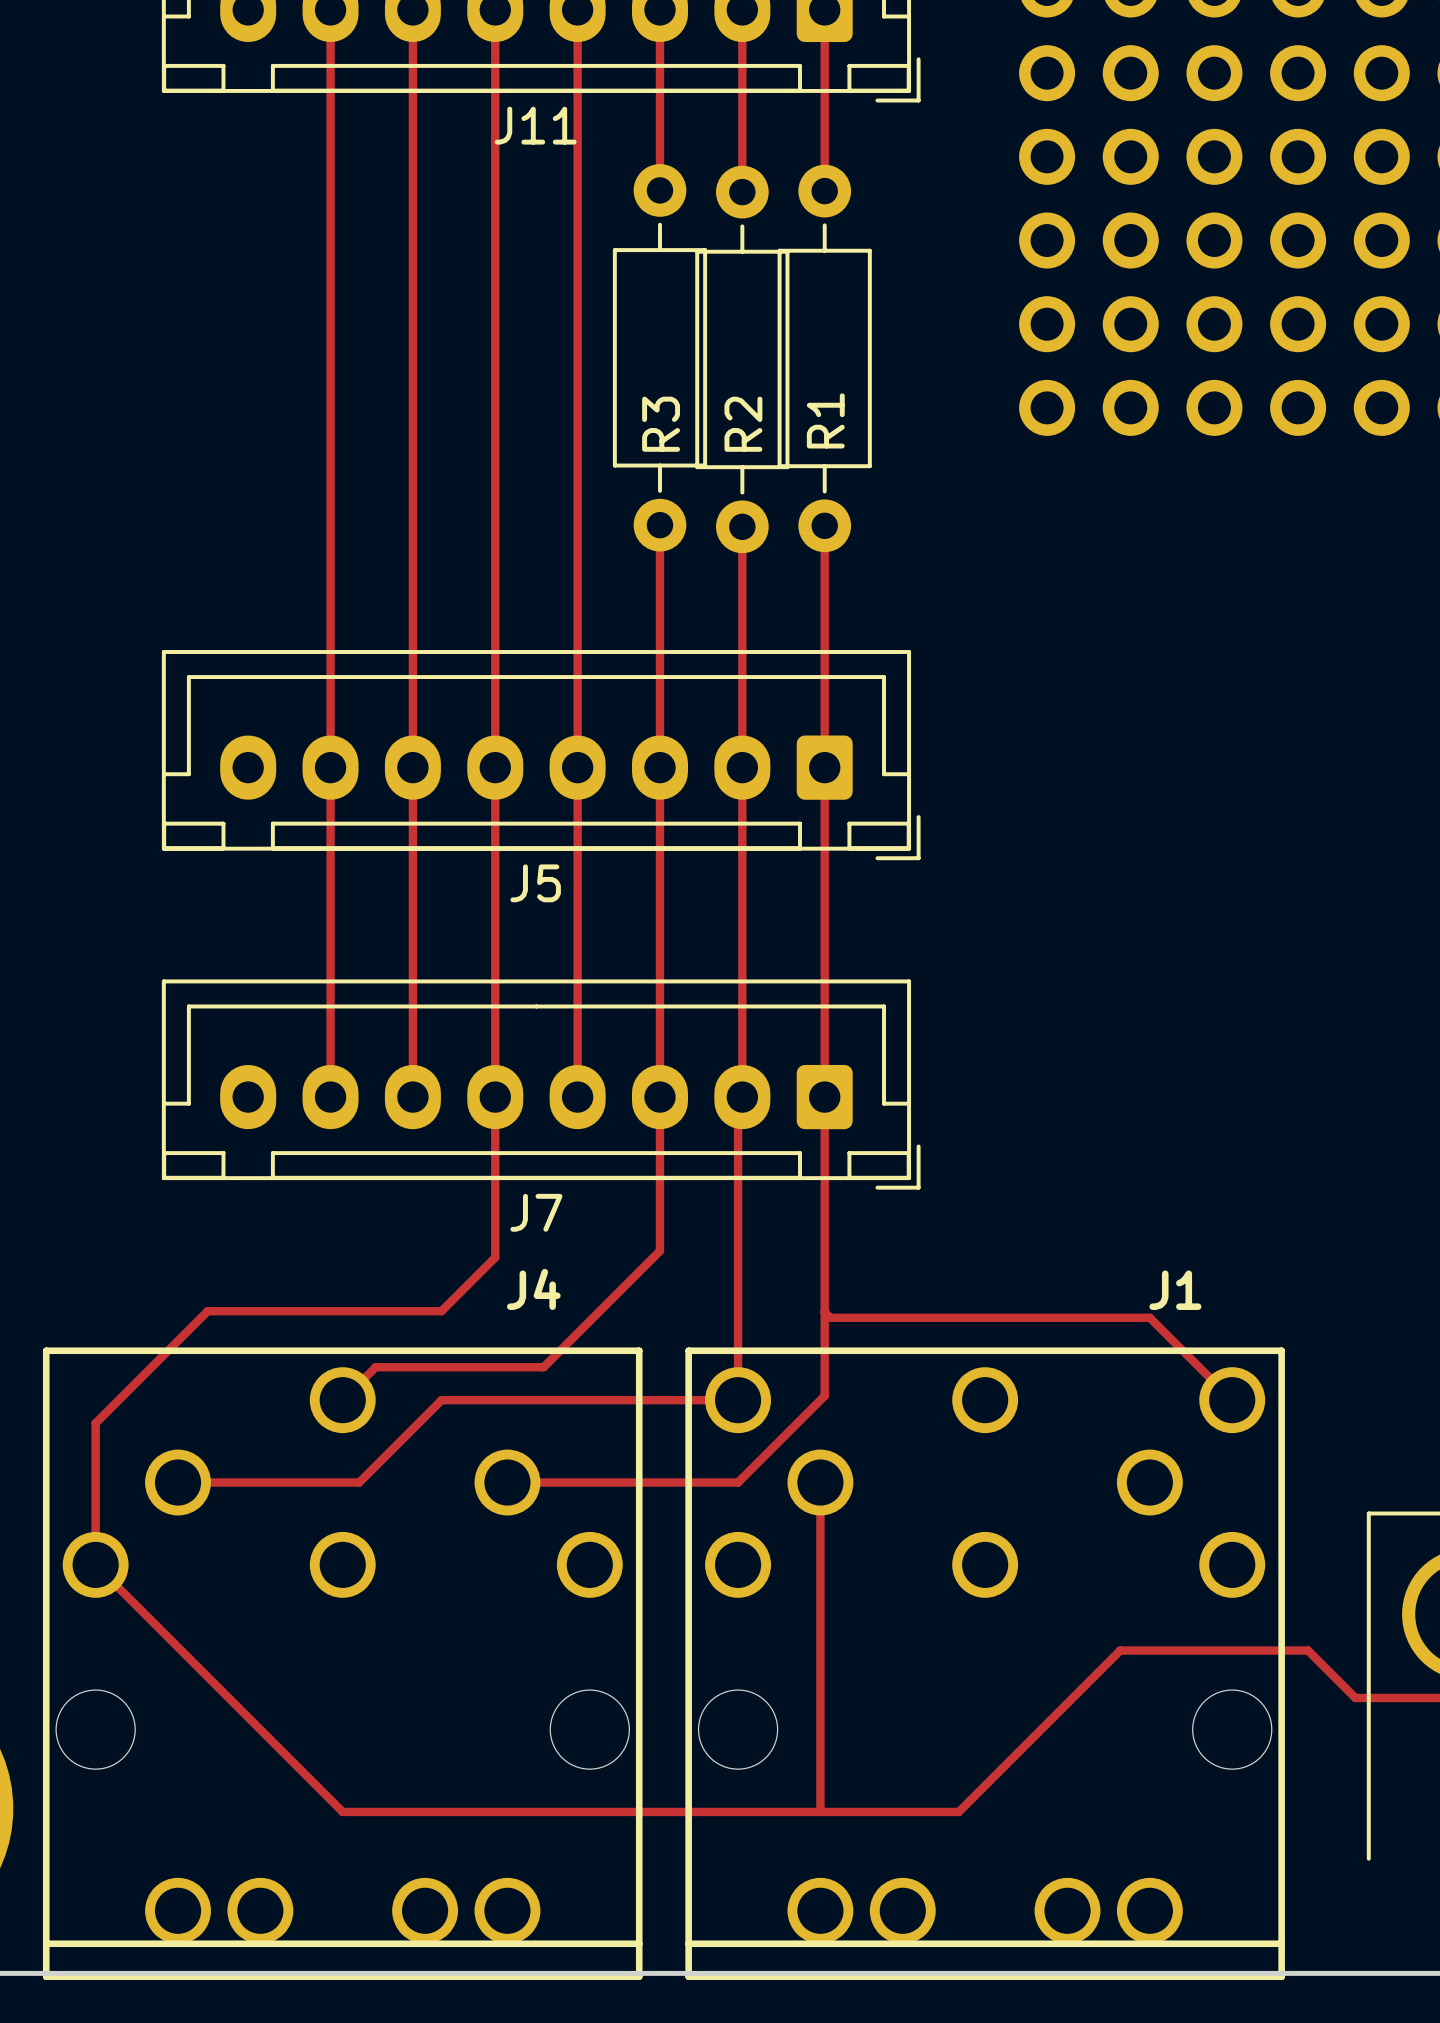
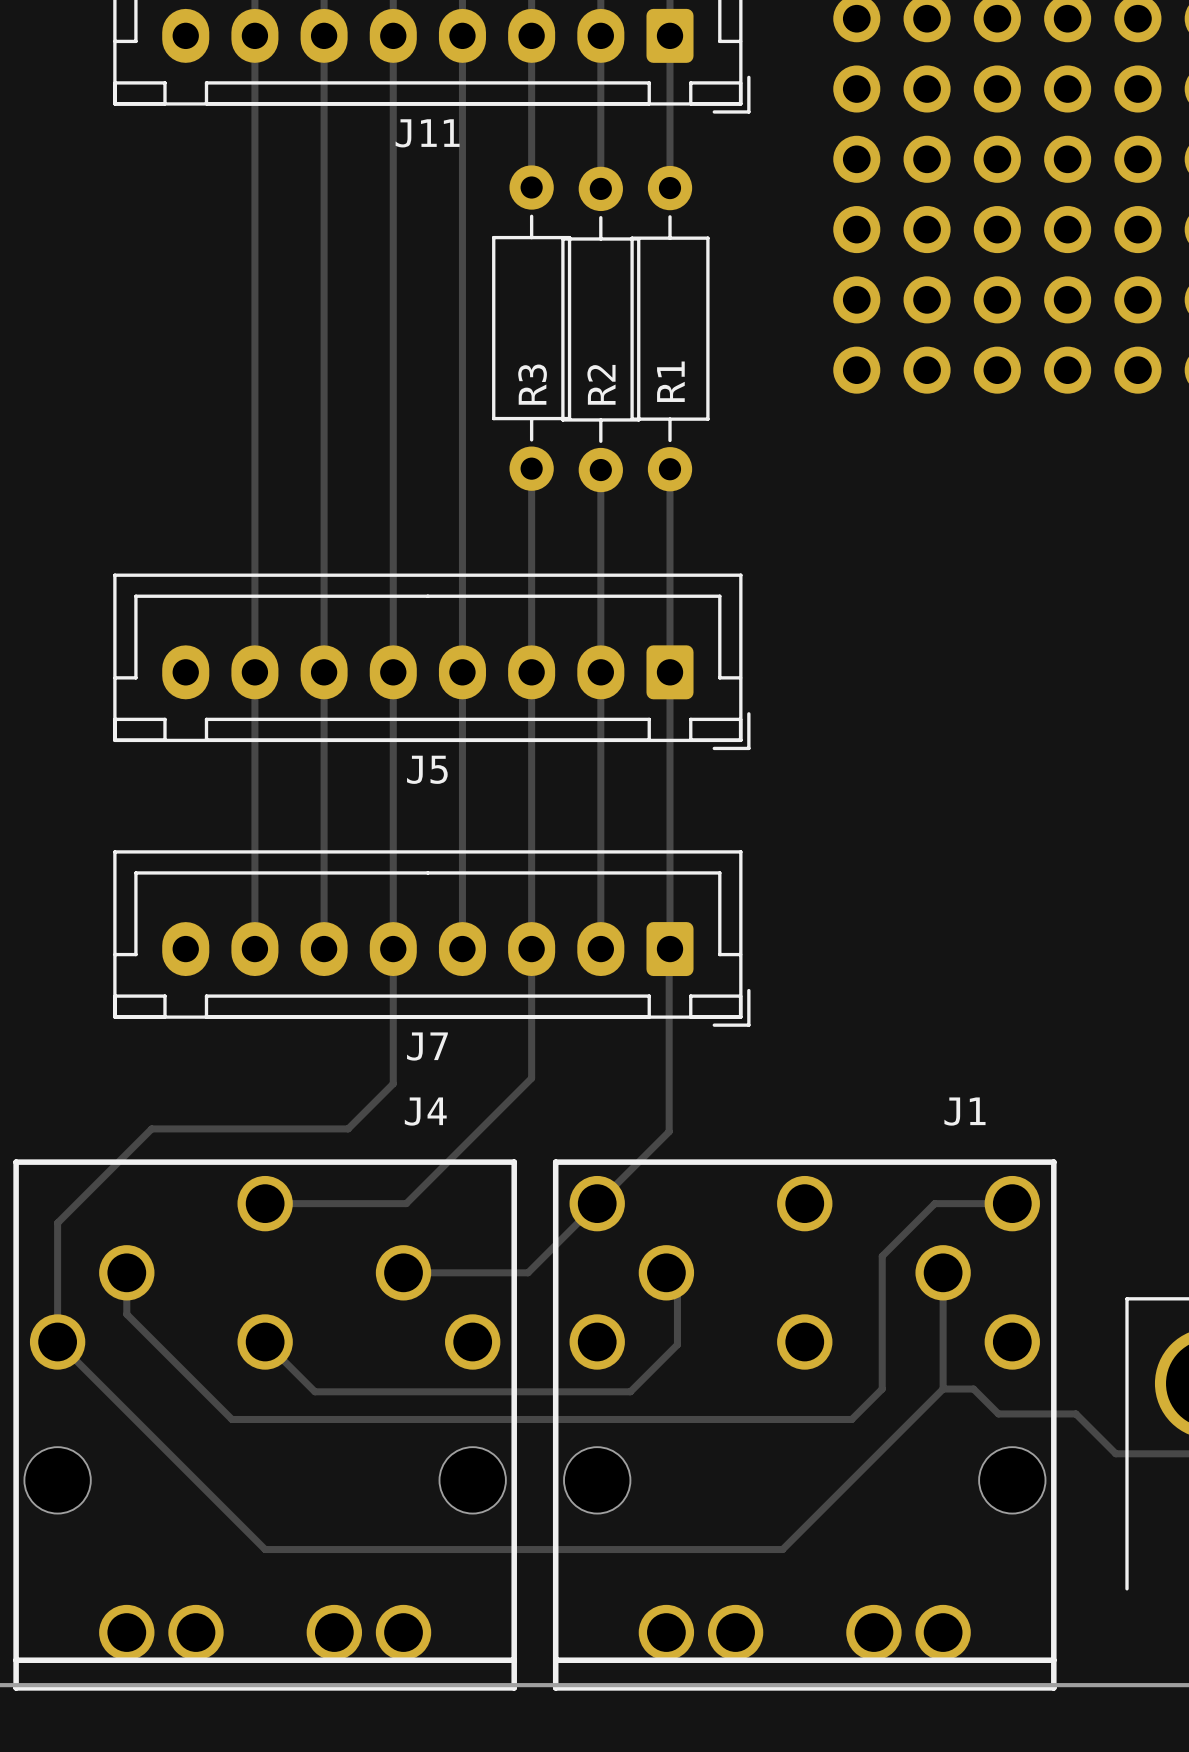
track: (742, 1097) (738, 1101) (738, 1400) (510, 1400) -> (433, 1175) (406, 1203)
track: (824, 1097) (824, 1395) (738, 1482) (655, 1482) -> (669, 949) (669, 1131) (528, 1272)
track: (824, 1312) (830, 1317) (1149, 1317) (1232, 1400) -> (126, 1272) (126, 1314) (231, 1419) (851, 1419) (882, 1389) (882, 1256) (934, 1203) (1012, 1203)
track: (543, 1367) (375, 1367) (342, 1400) -> (348, 1203) (265, 1203)
track: (441, 1400) (359, 1482) (178, 1482) -> none
track: (820, 1482) (820, 1811) -> none
track: none -> (943, 1272) (943, 1389)
track: none -> (677, 1283) (677, 1344) (630, 1391) (314, 1391) (265, 1341)
track: none -> (943, 1389) (918, 1413)
track: (1120, 1650) (1215, 1650) -> (943, 1389) (973, 1389) (998, 1413)

